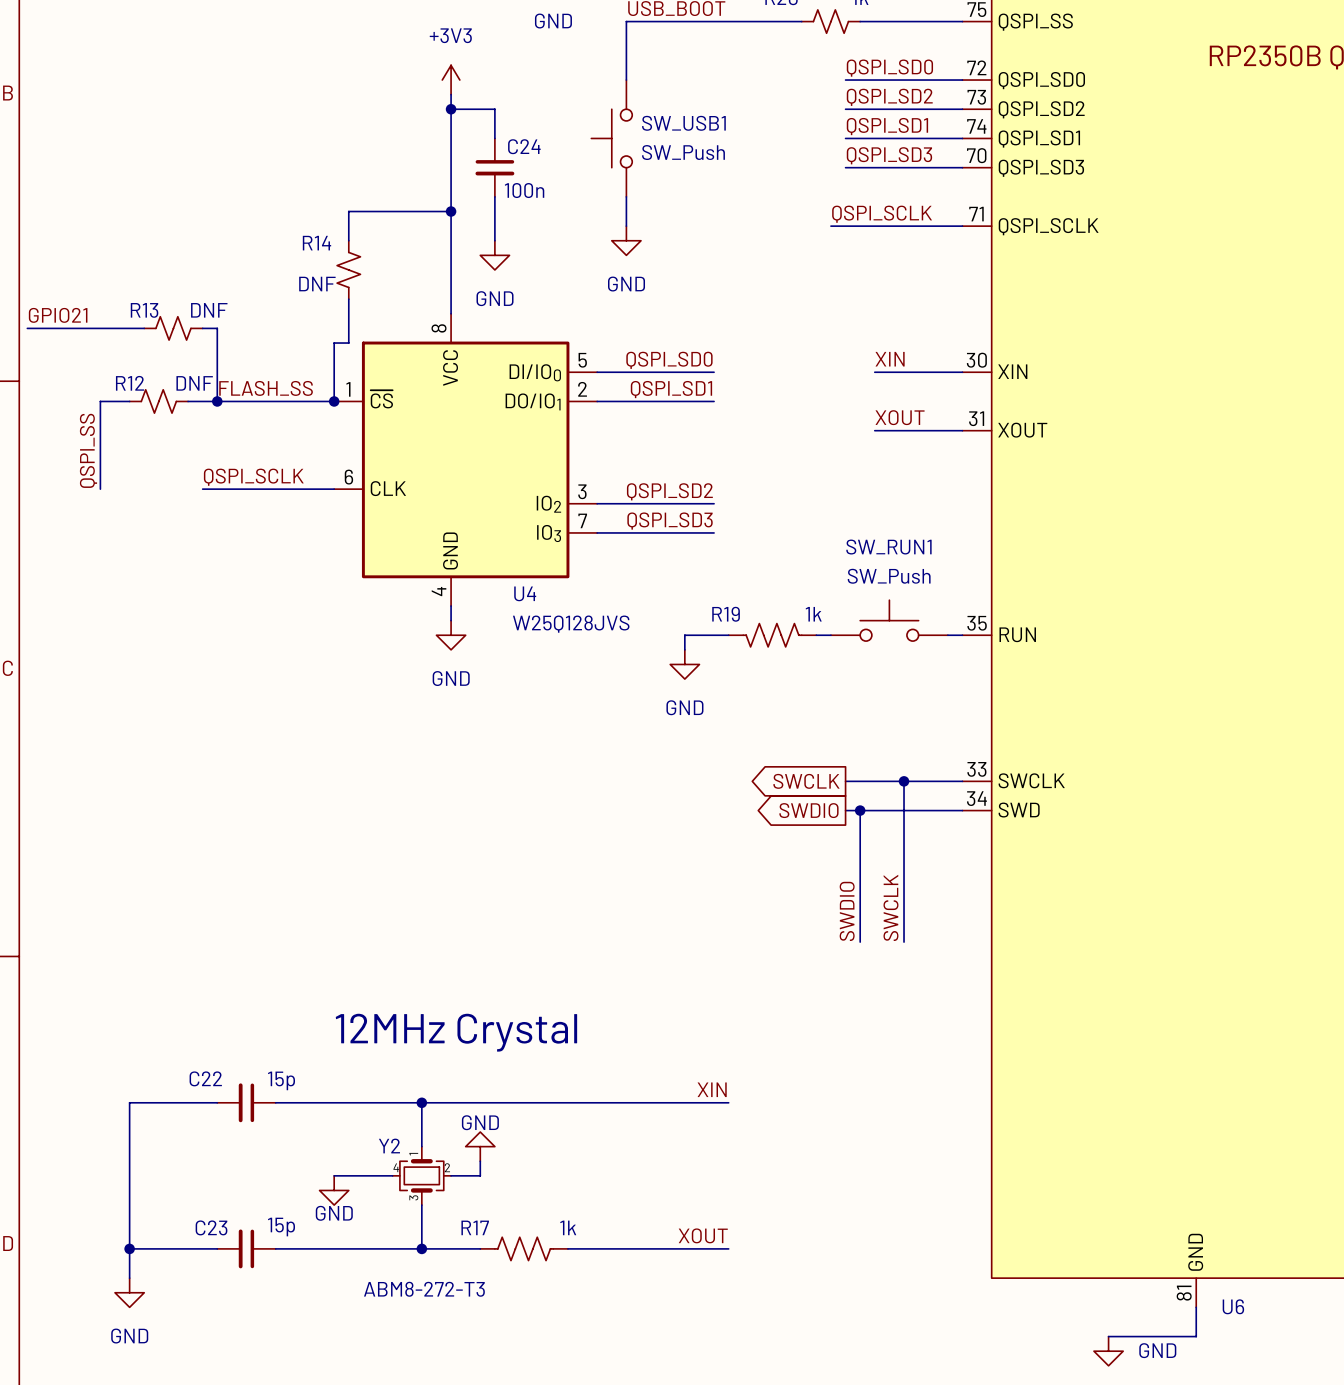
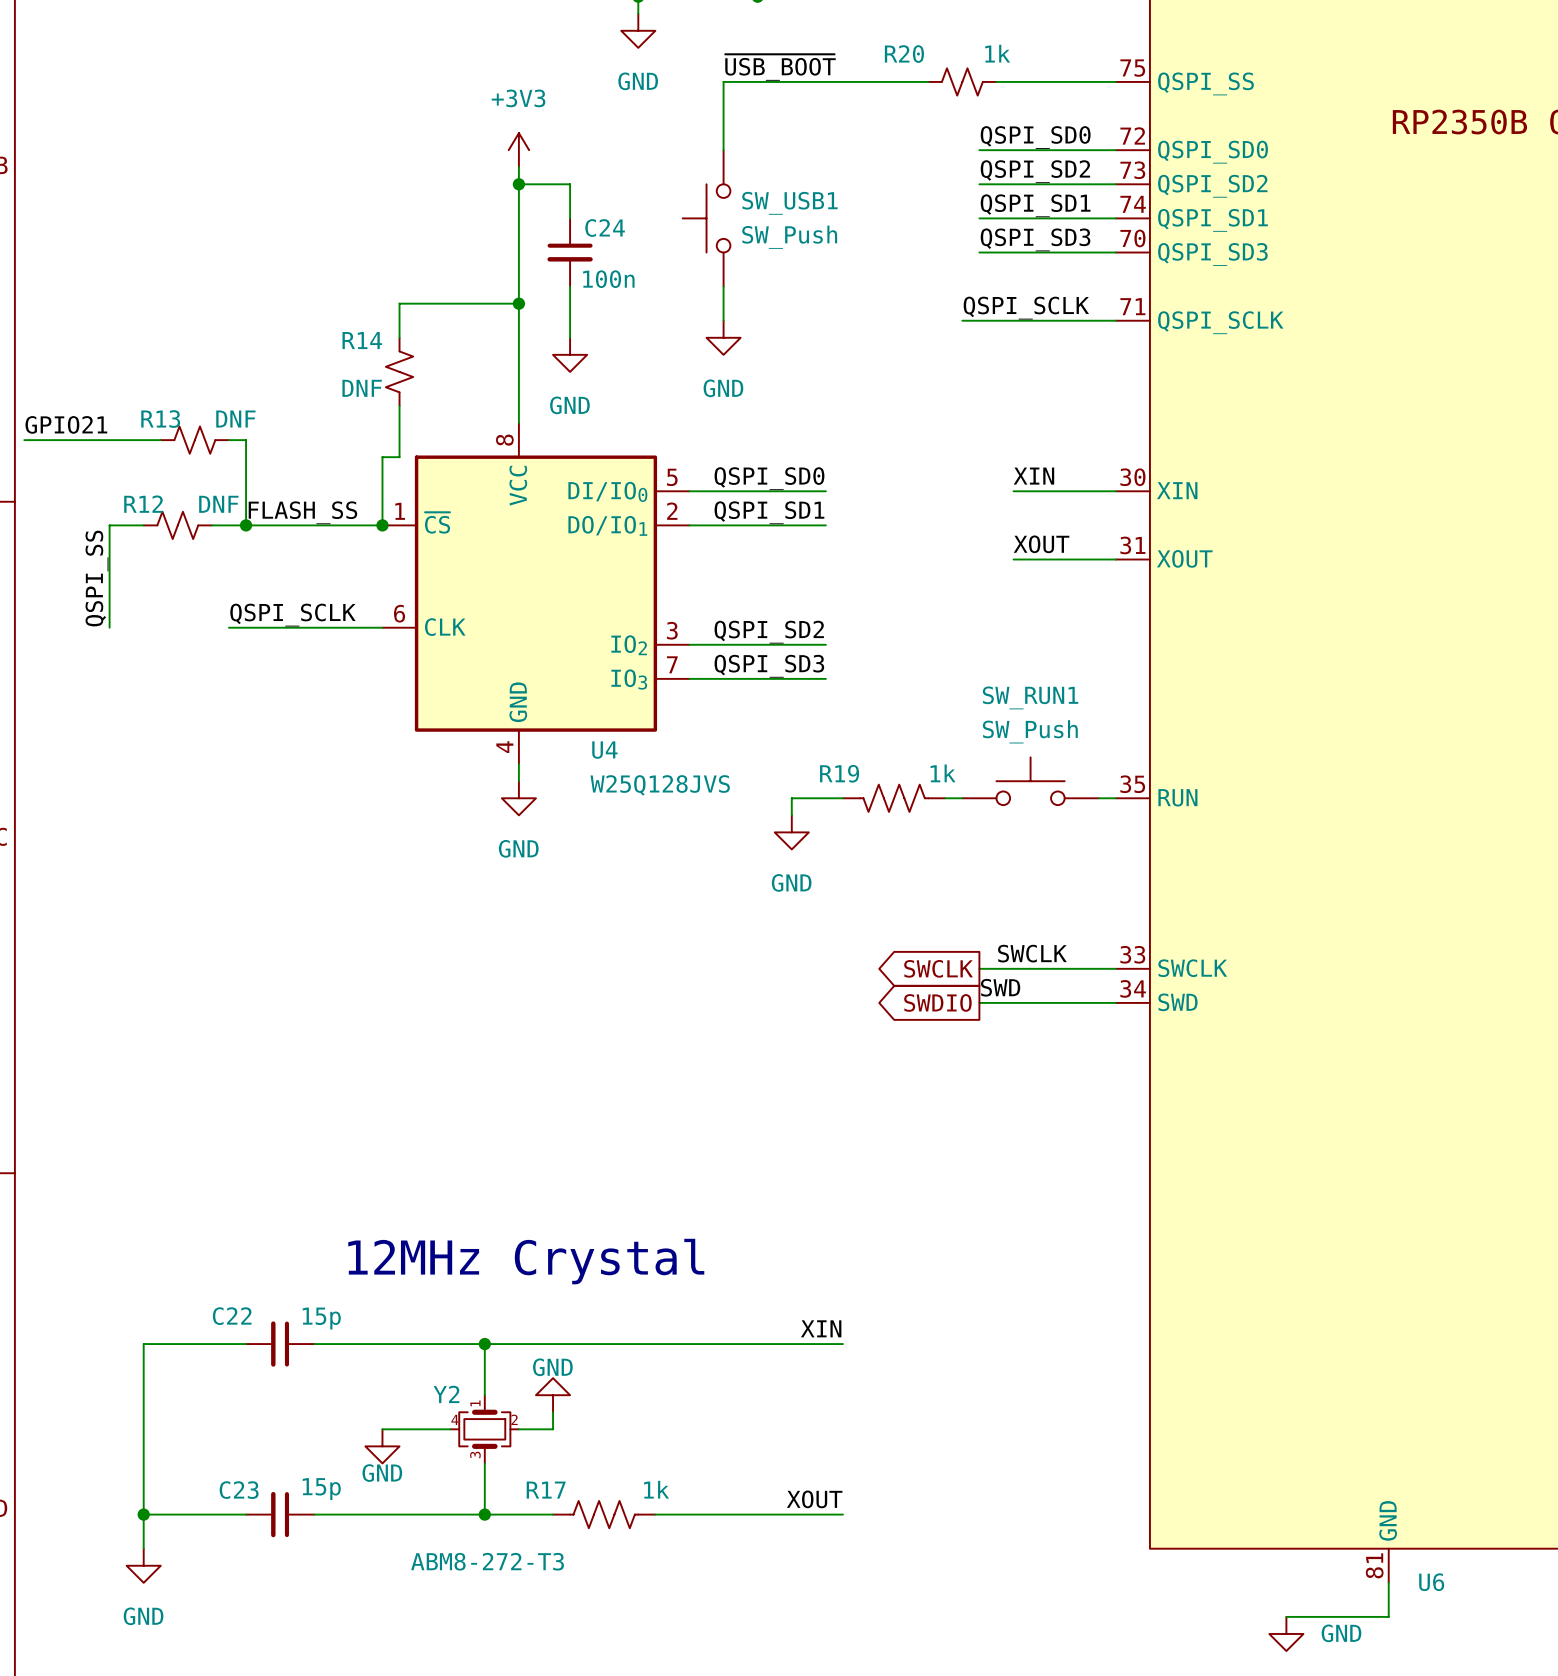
wire: (904, 781) (904, 942) -> none
junction: (904, 781) -> none
label: none -> SWD (1000, 987)
wire: (860, 810) (860, 942) -> none
junction: (860, 810) -> none
label rotation: 0° (890, 907) -> 90° clockwise (1032, 953)
label position: SWCLK (890, 907) -> SWCLK (1032, 953)
label: SWDIO (847, 911) -> none

